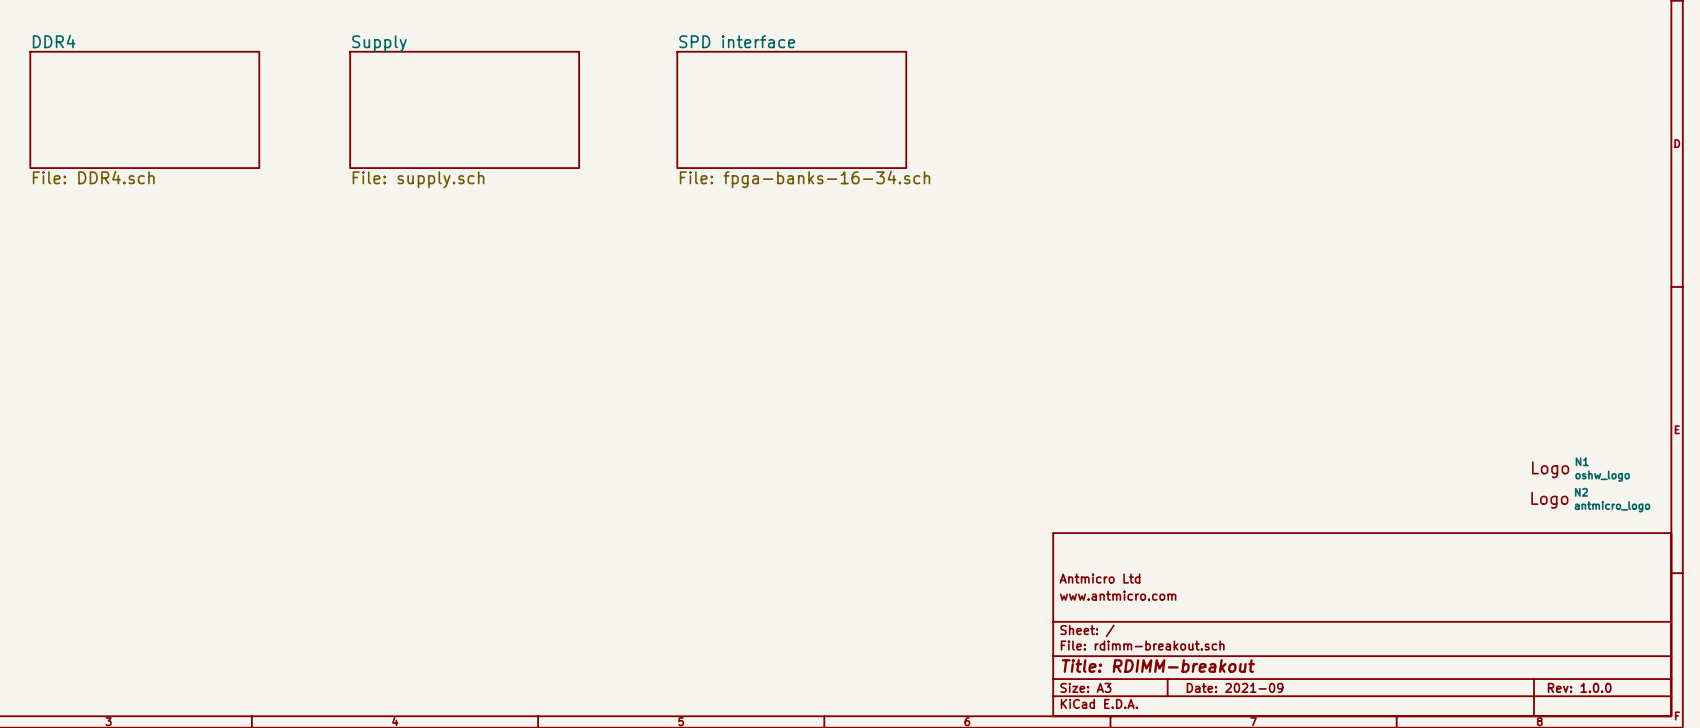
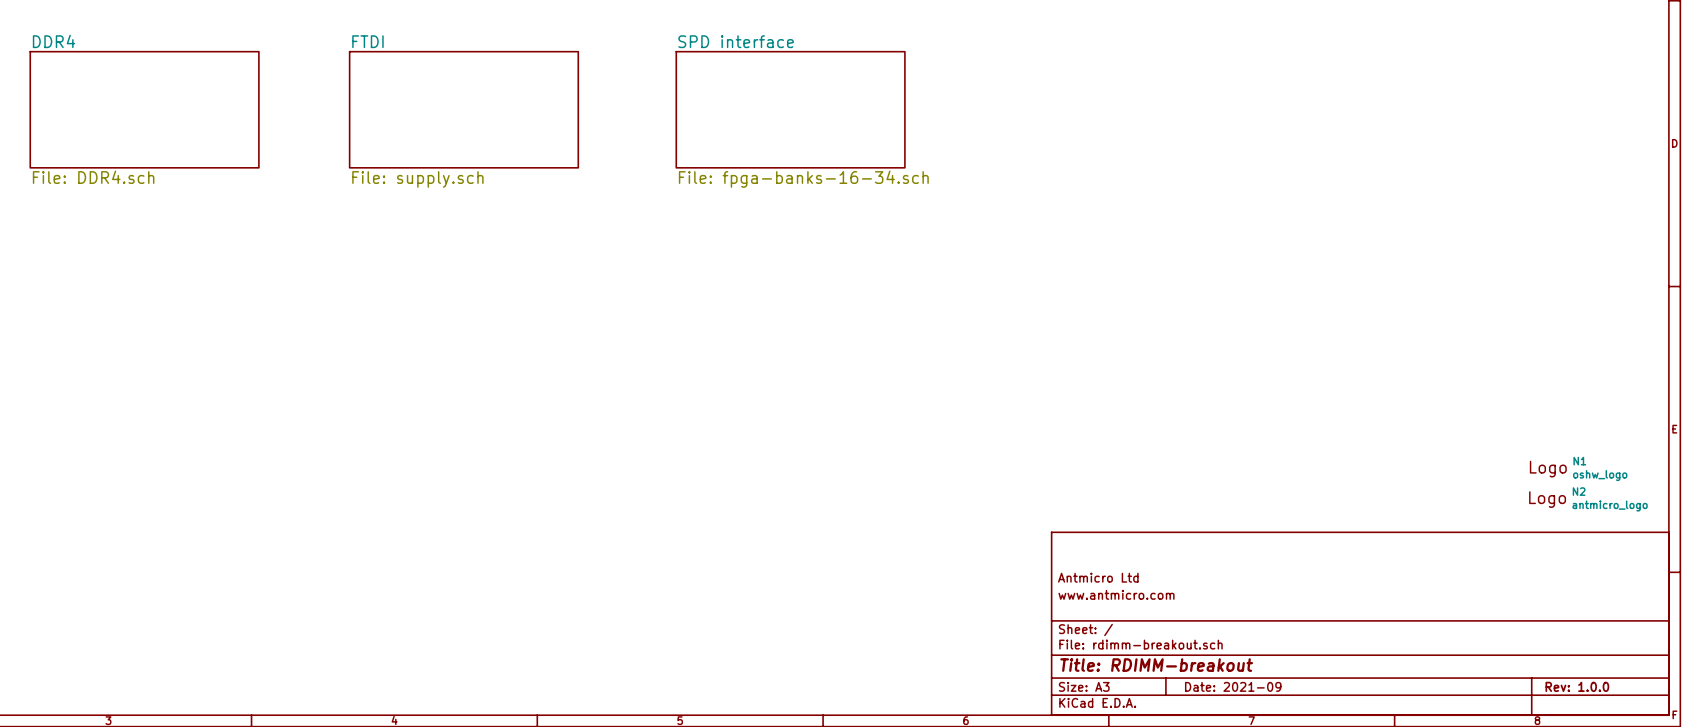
sheet Supply name: Supply (379, 43) -> FTDI (367, 41)

